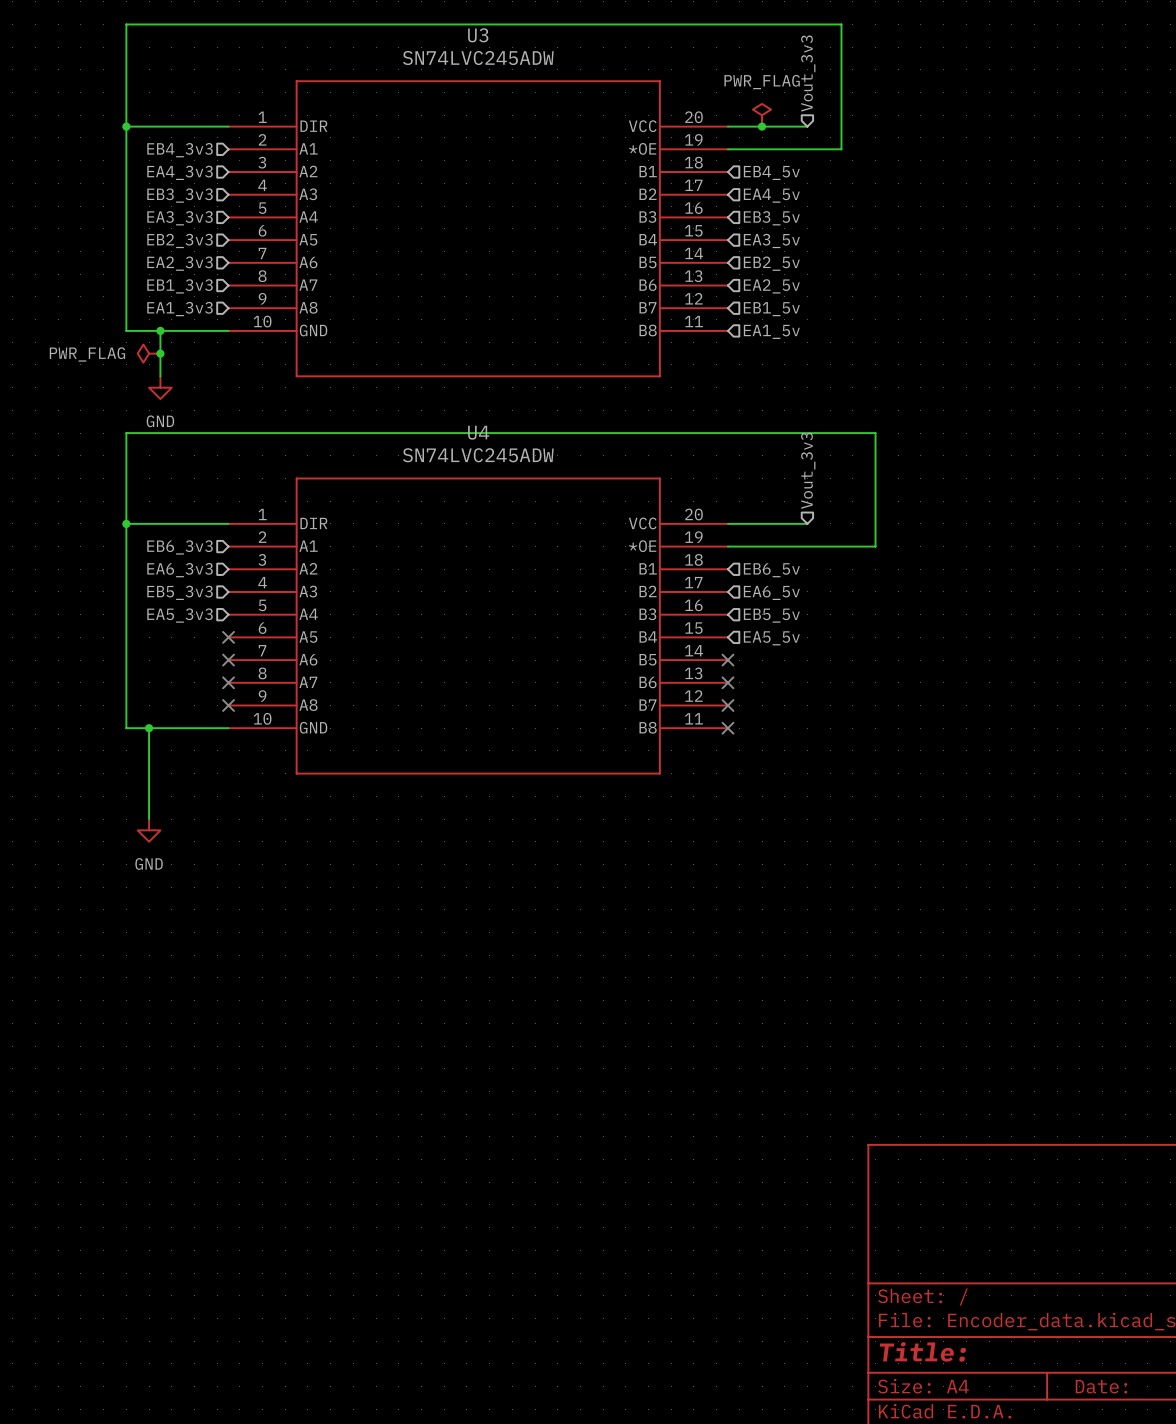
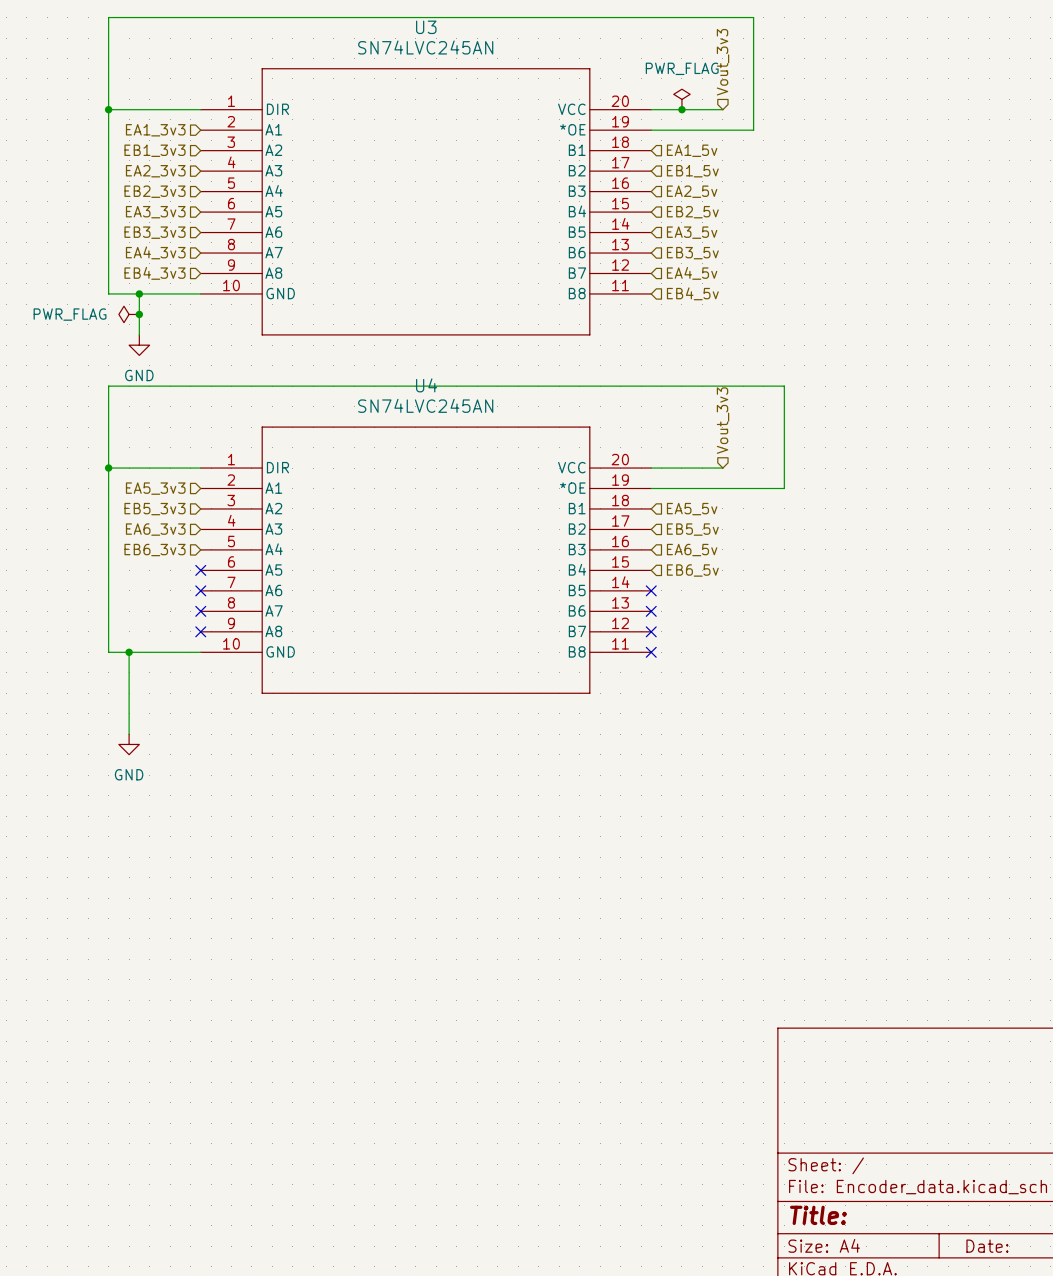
U3 value: SN74LVC245ADW (478, 58) -> SN74LVC245AN (425, 47)
hierarchical label: EB4_3v3 (180, 150) -> EA1_3v3 (155, 130)
hierarchical label: EA4_3v3 (180, 172) -> EB1_3v3 (155, 150)
hierarchical label: EB4_5v (771, 172) -> EA1_5v (692, 150)
hierarchical label: EB3_3v3 (180, 195) -> EA2_3v3 (155, 171)
hierarchical label: EA4_5v (771, 195) -> EB1_5v (692, 171)
hierarchical label: EA3_3v3 (180, 218) -> EB2_3v3 (155, 191)
hierarchical label: EB3_5v (771, 218) -> EA2_5v (692, 191)
hierarchical label: EB2_3v3 (180, 240) -> EA3_3v3 (155, 212)
hierarchical label: EA3_5v (771, 240) -> EB2_5v (692, 212)
hierarchical label: EA2_3v3 (180, 263) -> EB3_3v3 (155, 232)
hierarchical label: EB2_5v (771, 263) -> EA3_5v (692, 232)
hierarchical label: EB1_3v3 (180, 286) -> EA4_3v3 (155, 252)
hierarchical label: EA2_5v (771, 286) -> EB3_5v (692, 253)
hierarchical label: EA1_3v3 (180, 309) -> EB4_3v3 (155, 273)
hierarchical label: EB1_5v (771, 309) -> EA4_5v (692, 273)
hierarchical label: EA1_5v (771, 331) -> EB4_5v (692, 293)
U4 value: SN74LVC245ADW (478, 455) -> SN74LVC245AN (425, 405)
hierarchical label: EB6_3v3 (180, 547) -> EA5_3v3 (155, 488)
hierarchical label: EA6_3v3 (180, 570) -> EB5_3v3 (155, 509)
hierarchical label: EB6_5v (771, 570) -> EA5_5v (692, 509)
hierarchical label: EB5_3v3 (180, 592) -> EA6_3v3 (155, 529)
hierarchical label: EA6_5v (771, 592) -> EB5_5v (692, 529)
hierarchical label: EA5_3v3 (180, 615) -> EB6_3v3 (155, 550)
hierarchical label: EB5_5v (771, 615) -> EA6_5v (692, 550)
hierarchical label: EA5_5v (771, 638) -> EB6_5v (692, 570)

